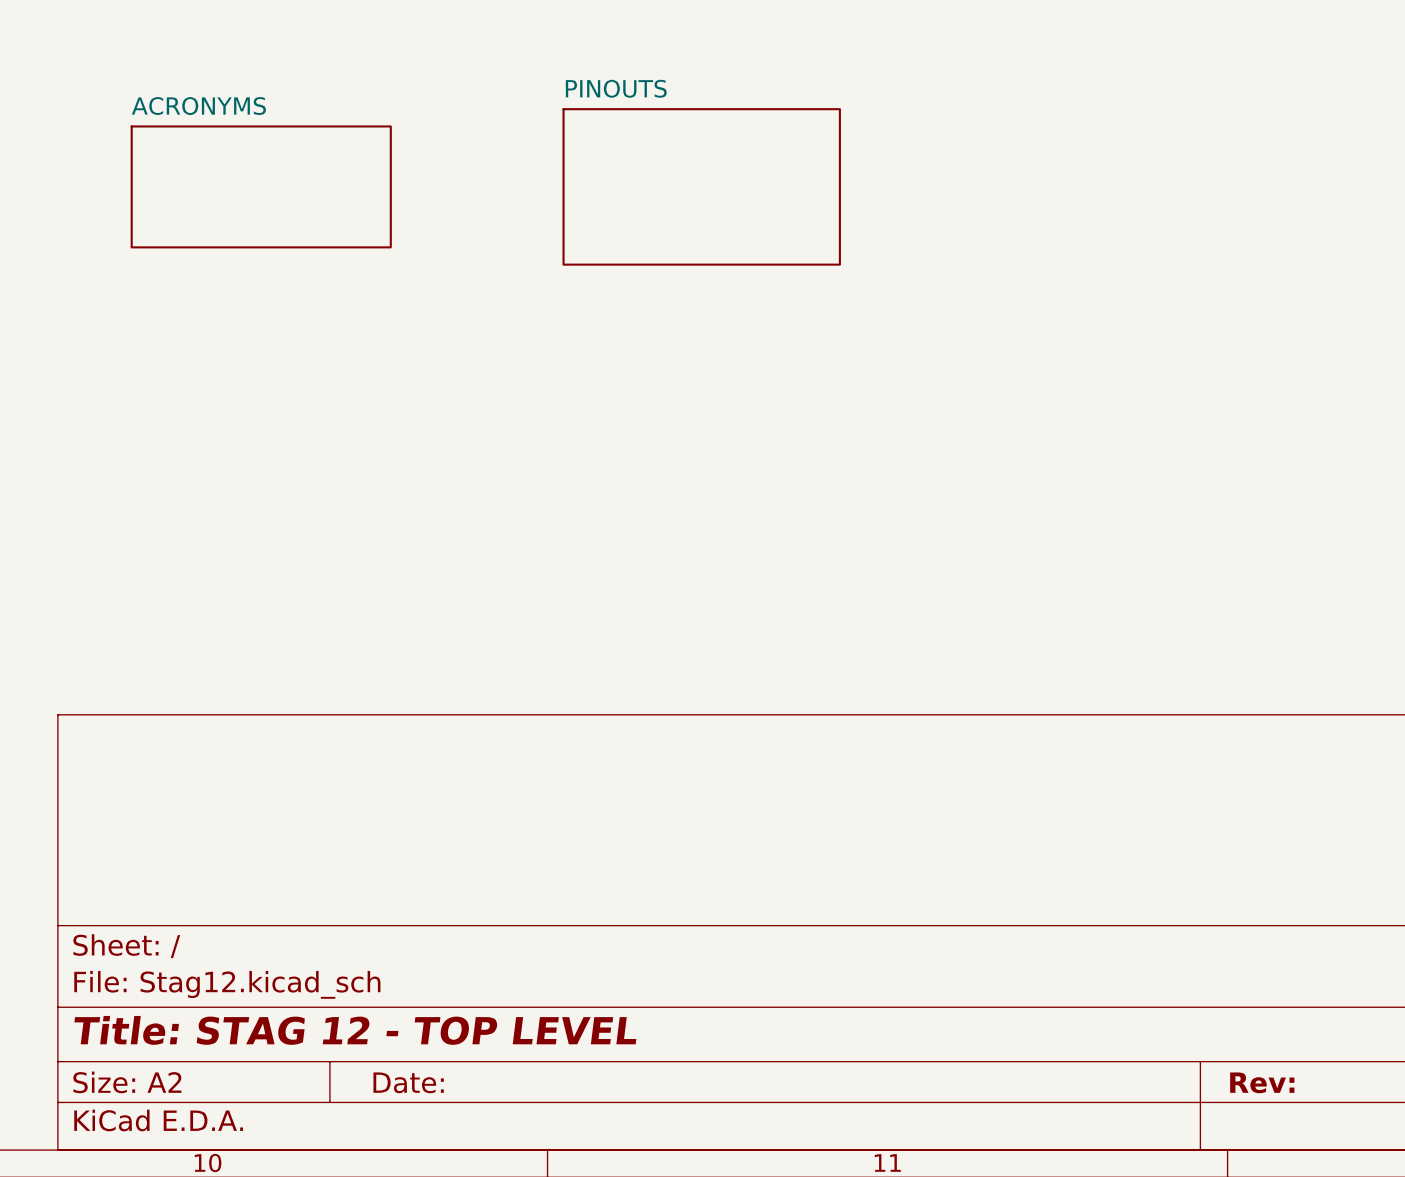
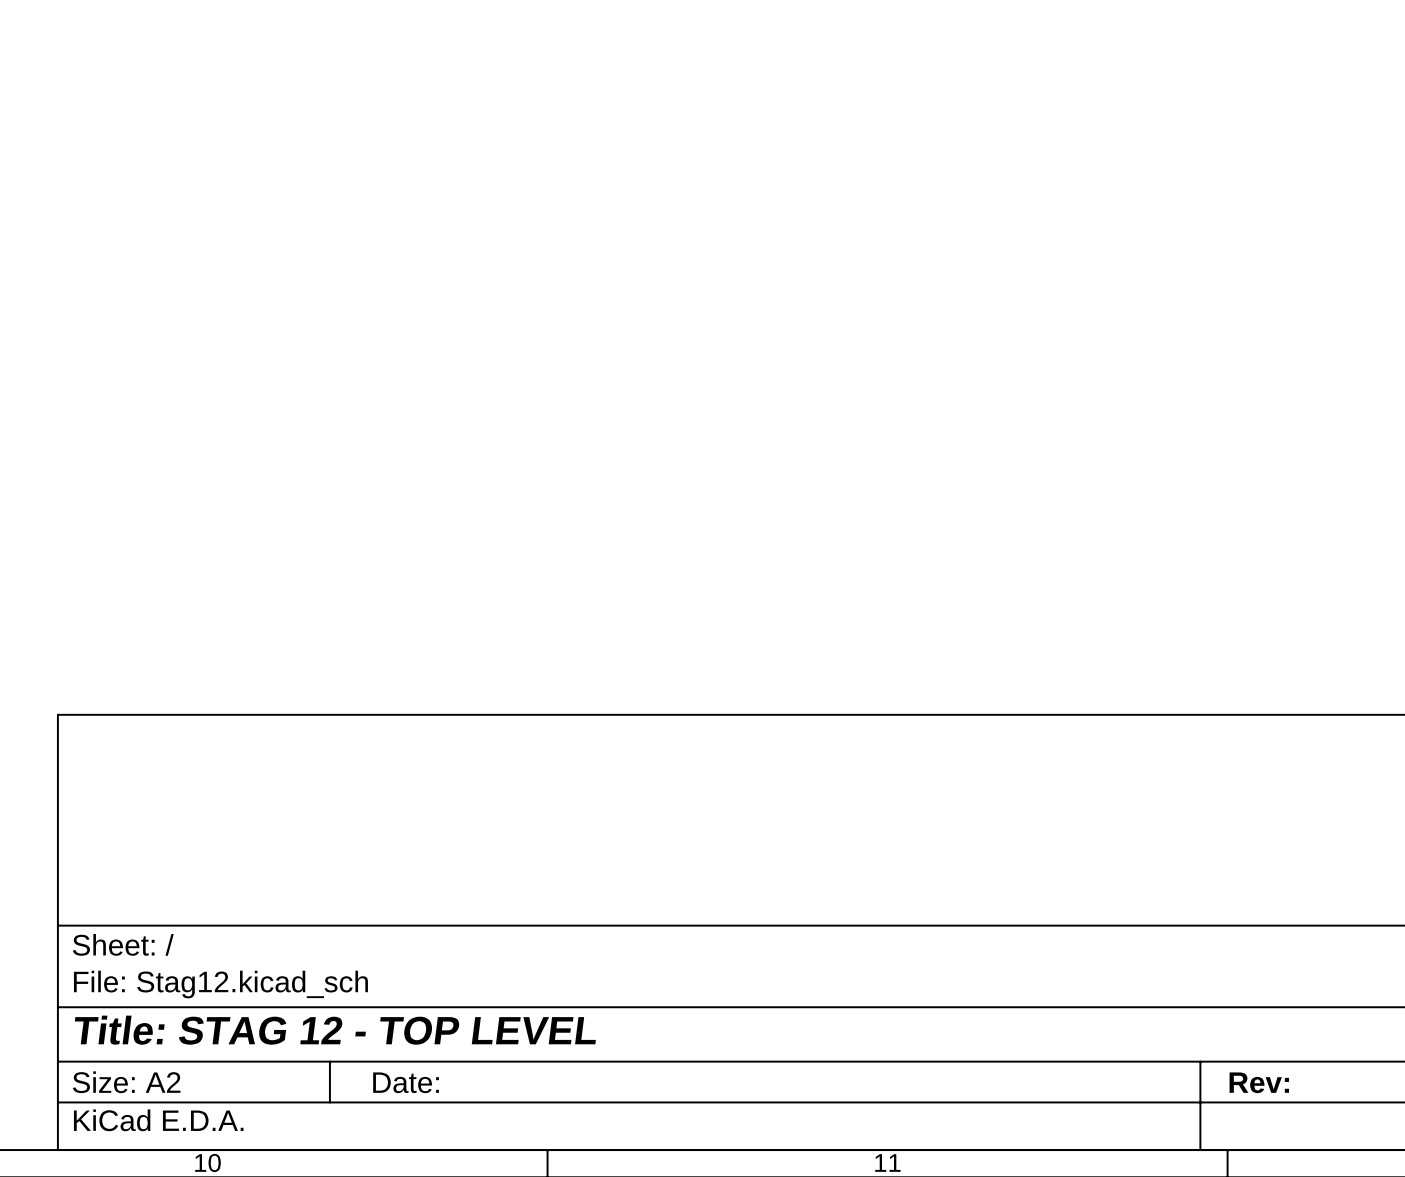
sheet ACRONYMS: (261, 186) -> none
sheet PINOUTS: (701, 186) -> none

